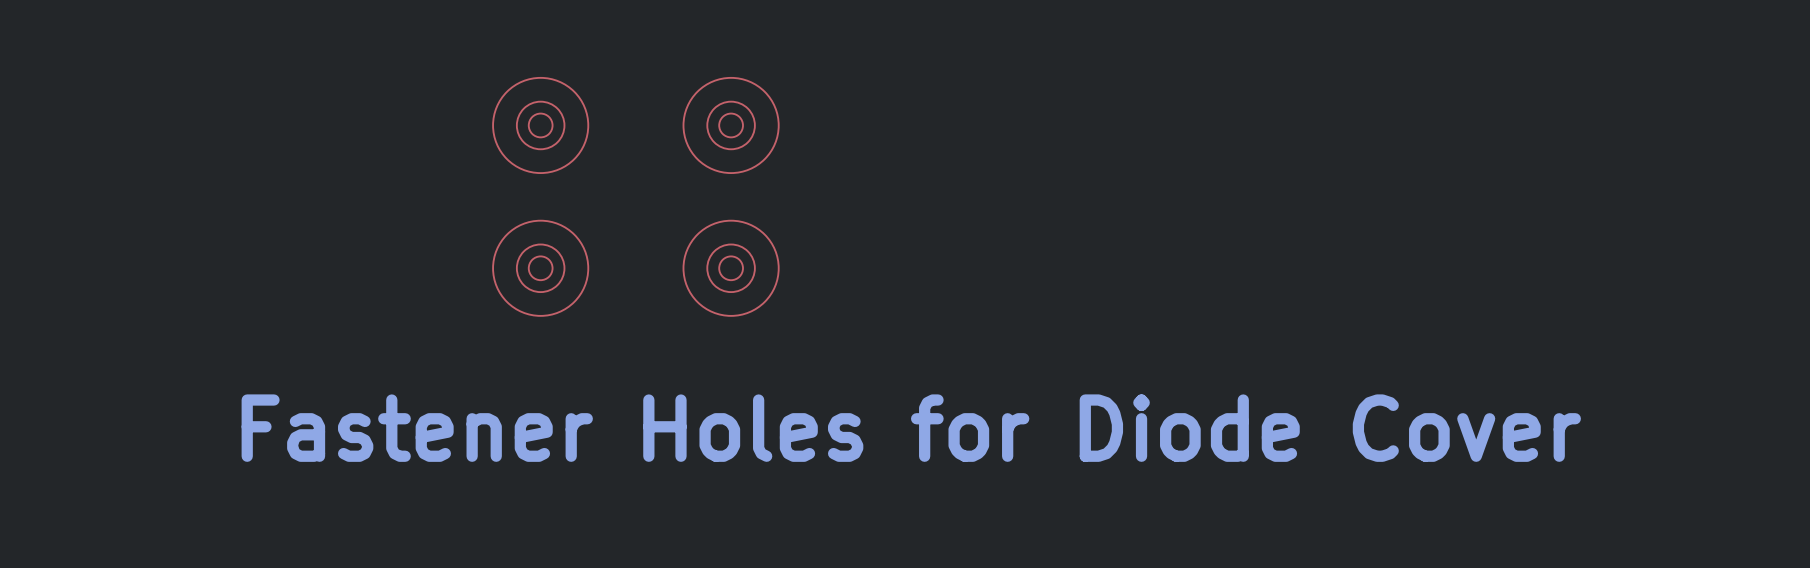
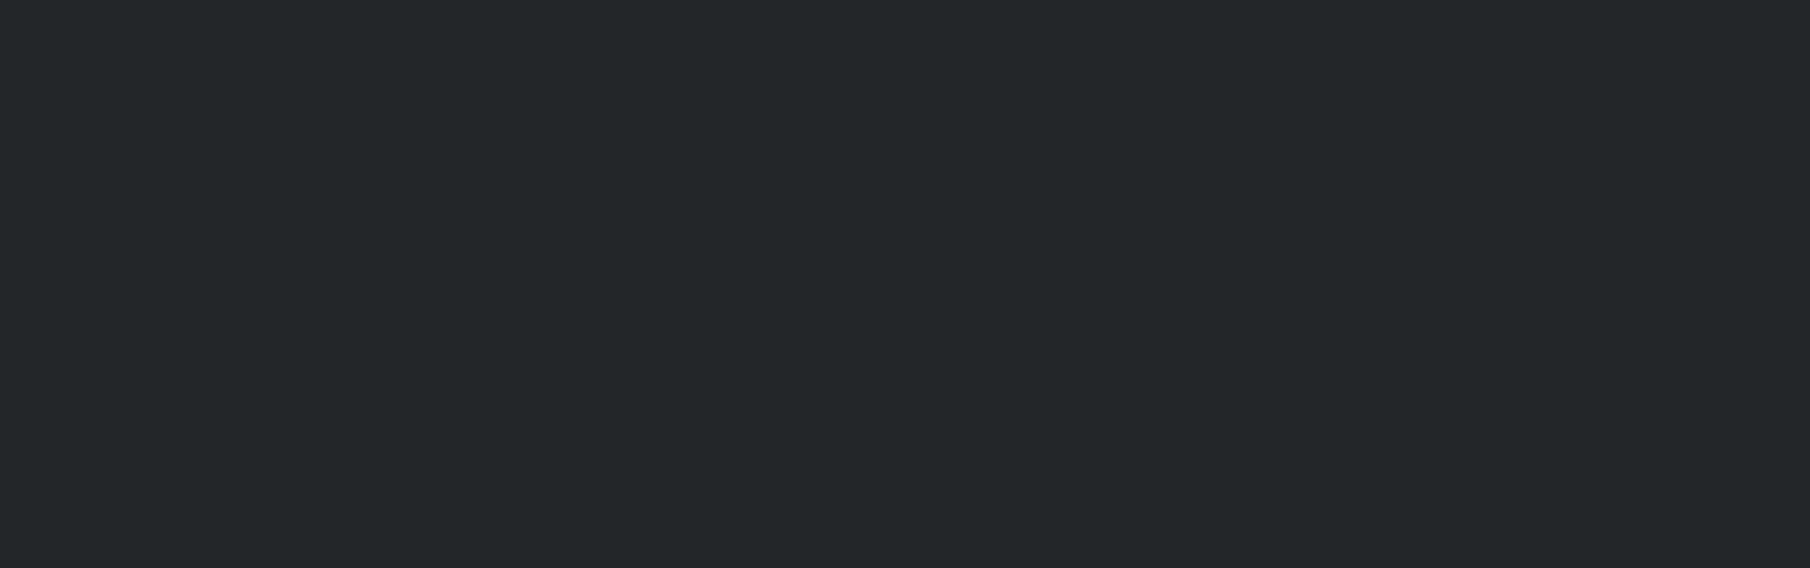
part: (540, 125) -> none
part: (731, 125) -> none
part: (540, 268) -> none
part: (731, 268) -> none
text: Fastener Holes for Diode Cover (911, 428) -> none

